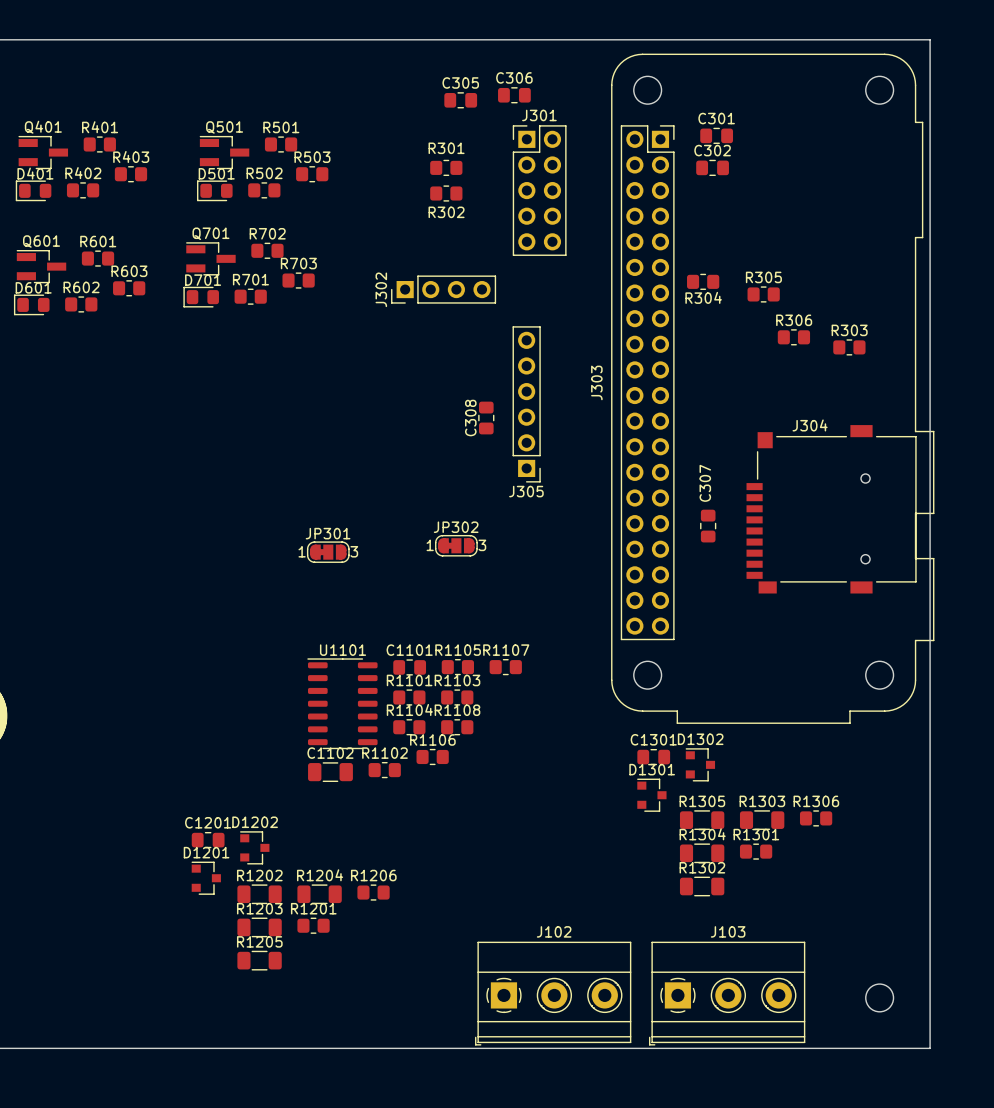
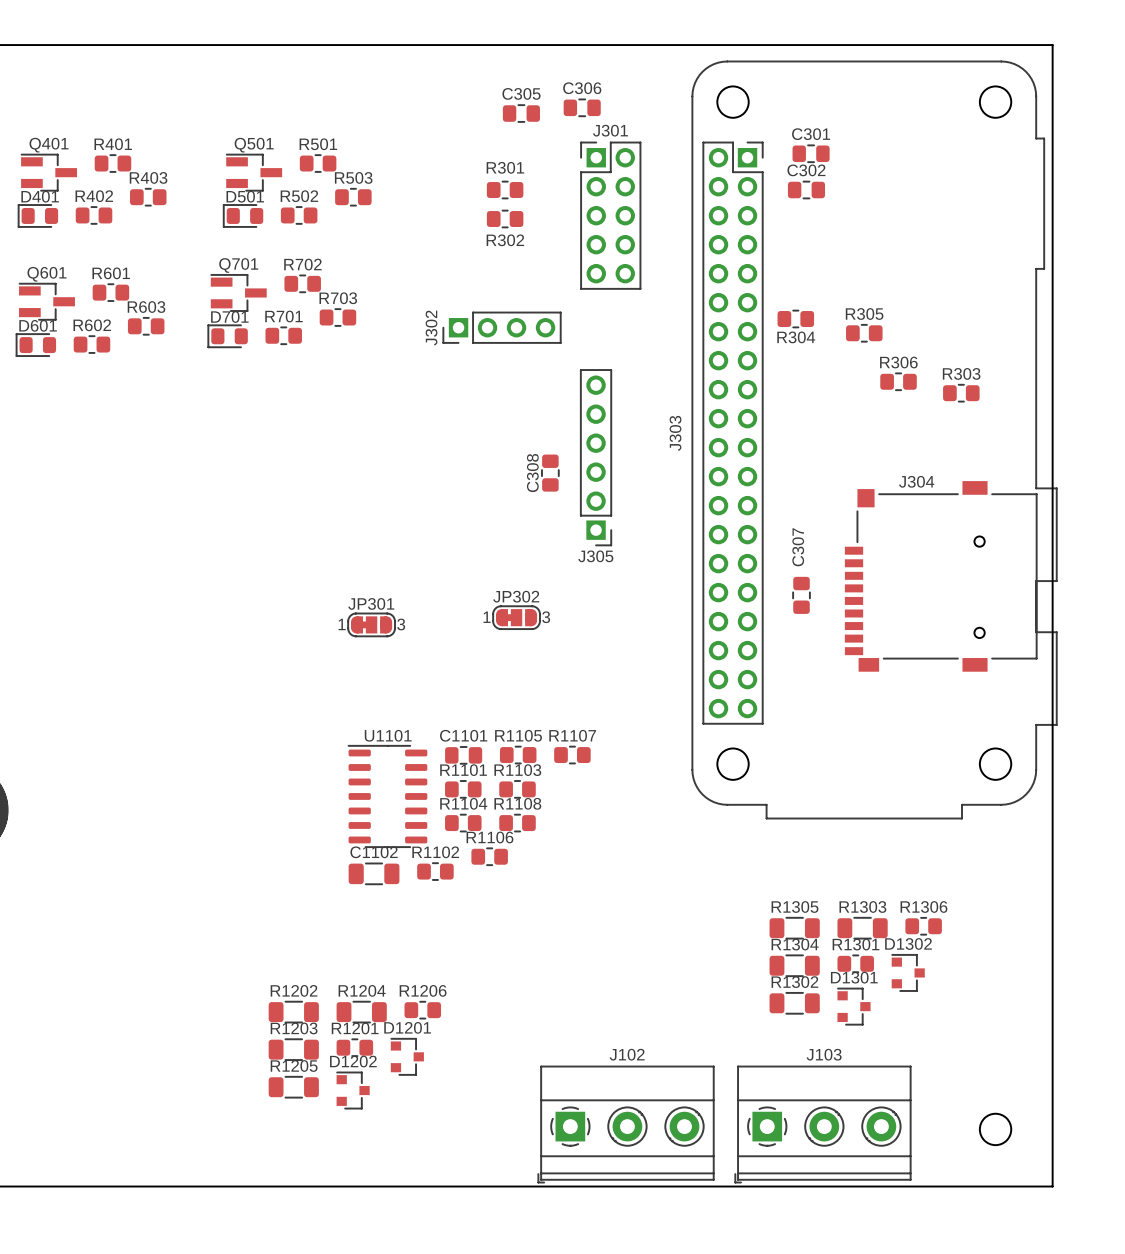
C1301: (653, 757) -> none
D1302 position: (700, 764) -> (908, 972)
D1301 position: (651, 795) -> (853, 1006)
C1201: (208, 840) -> none
D1202 position: (254, 847) -> (353, 1090)
D1201 position: (206, 878) -> (407, 1056)

